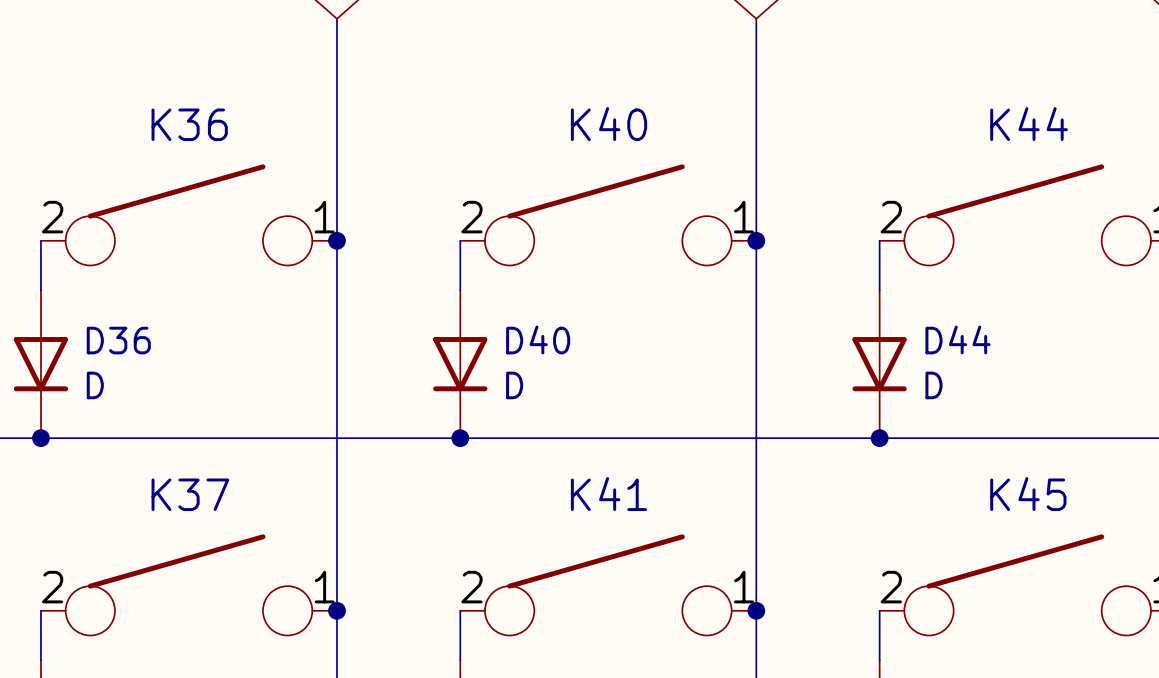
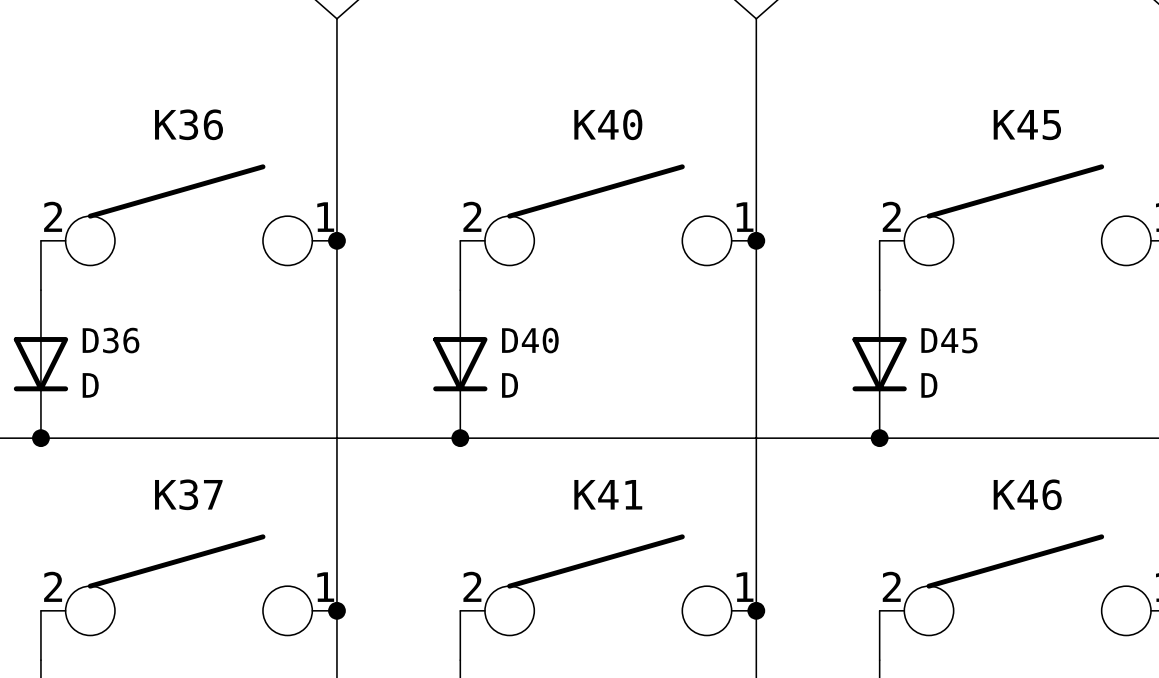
K44 name: K44 (1029, 124) -> K45 (1027, 125)
D44 name: D44 (958, 339) -> D45 (949, 340)
K45 name: K45 (1028, 494) -> K46 (1027, 494)

